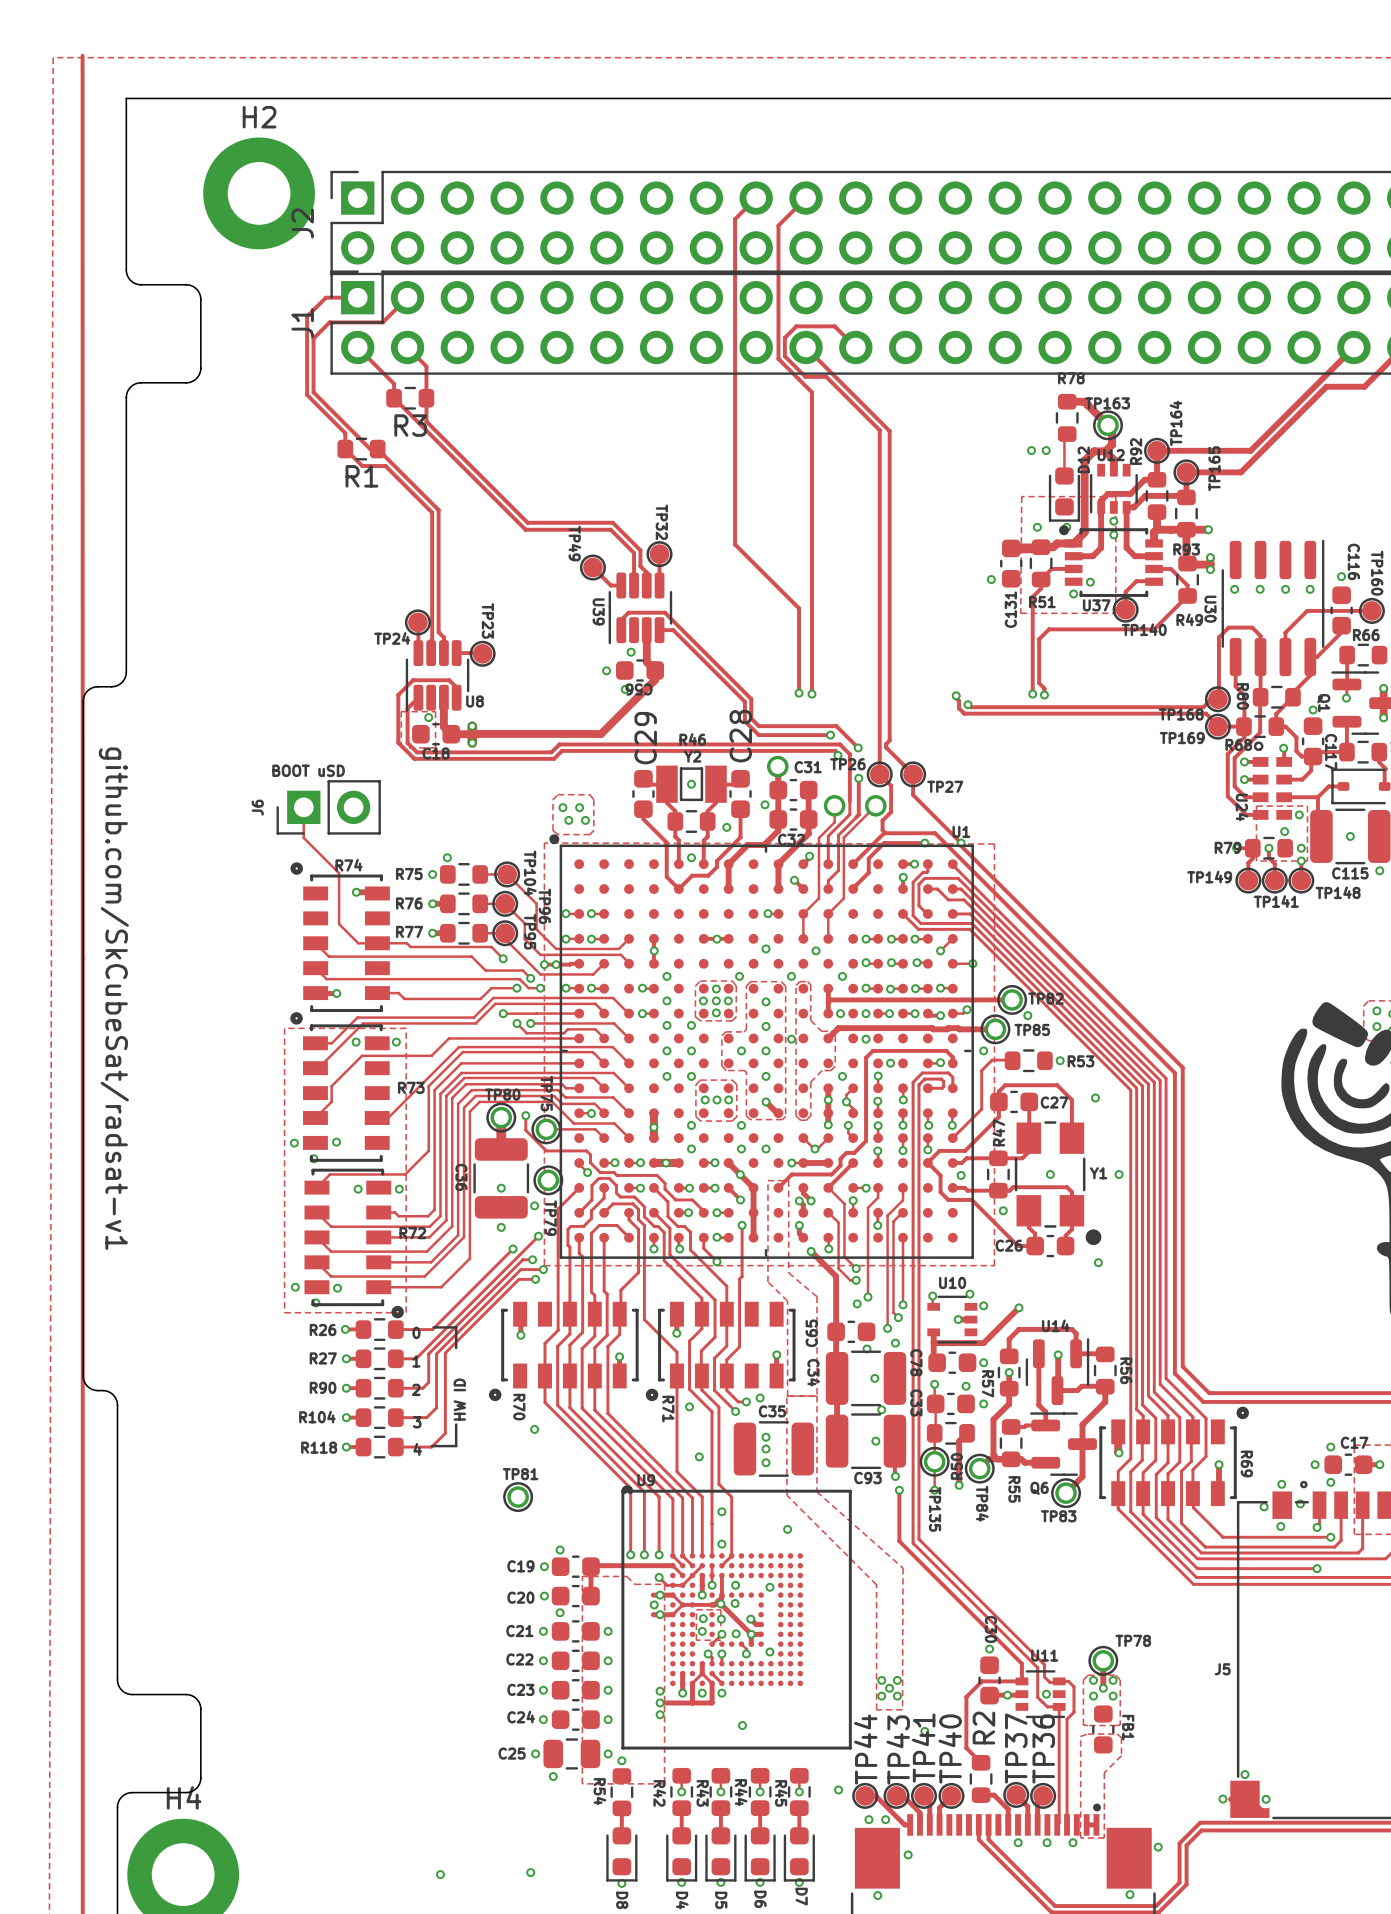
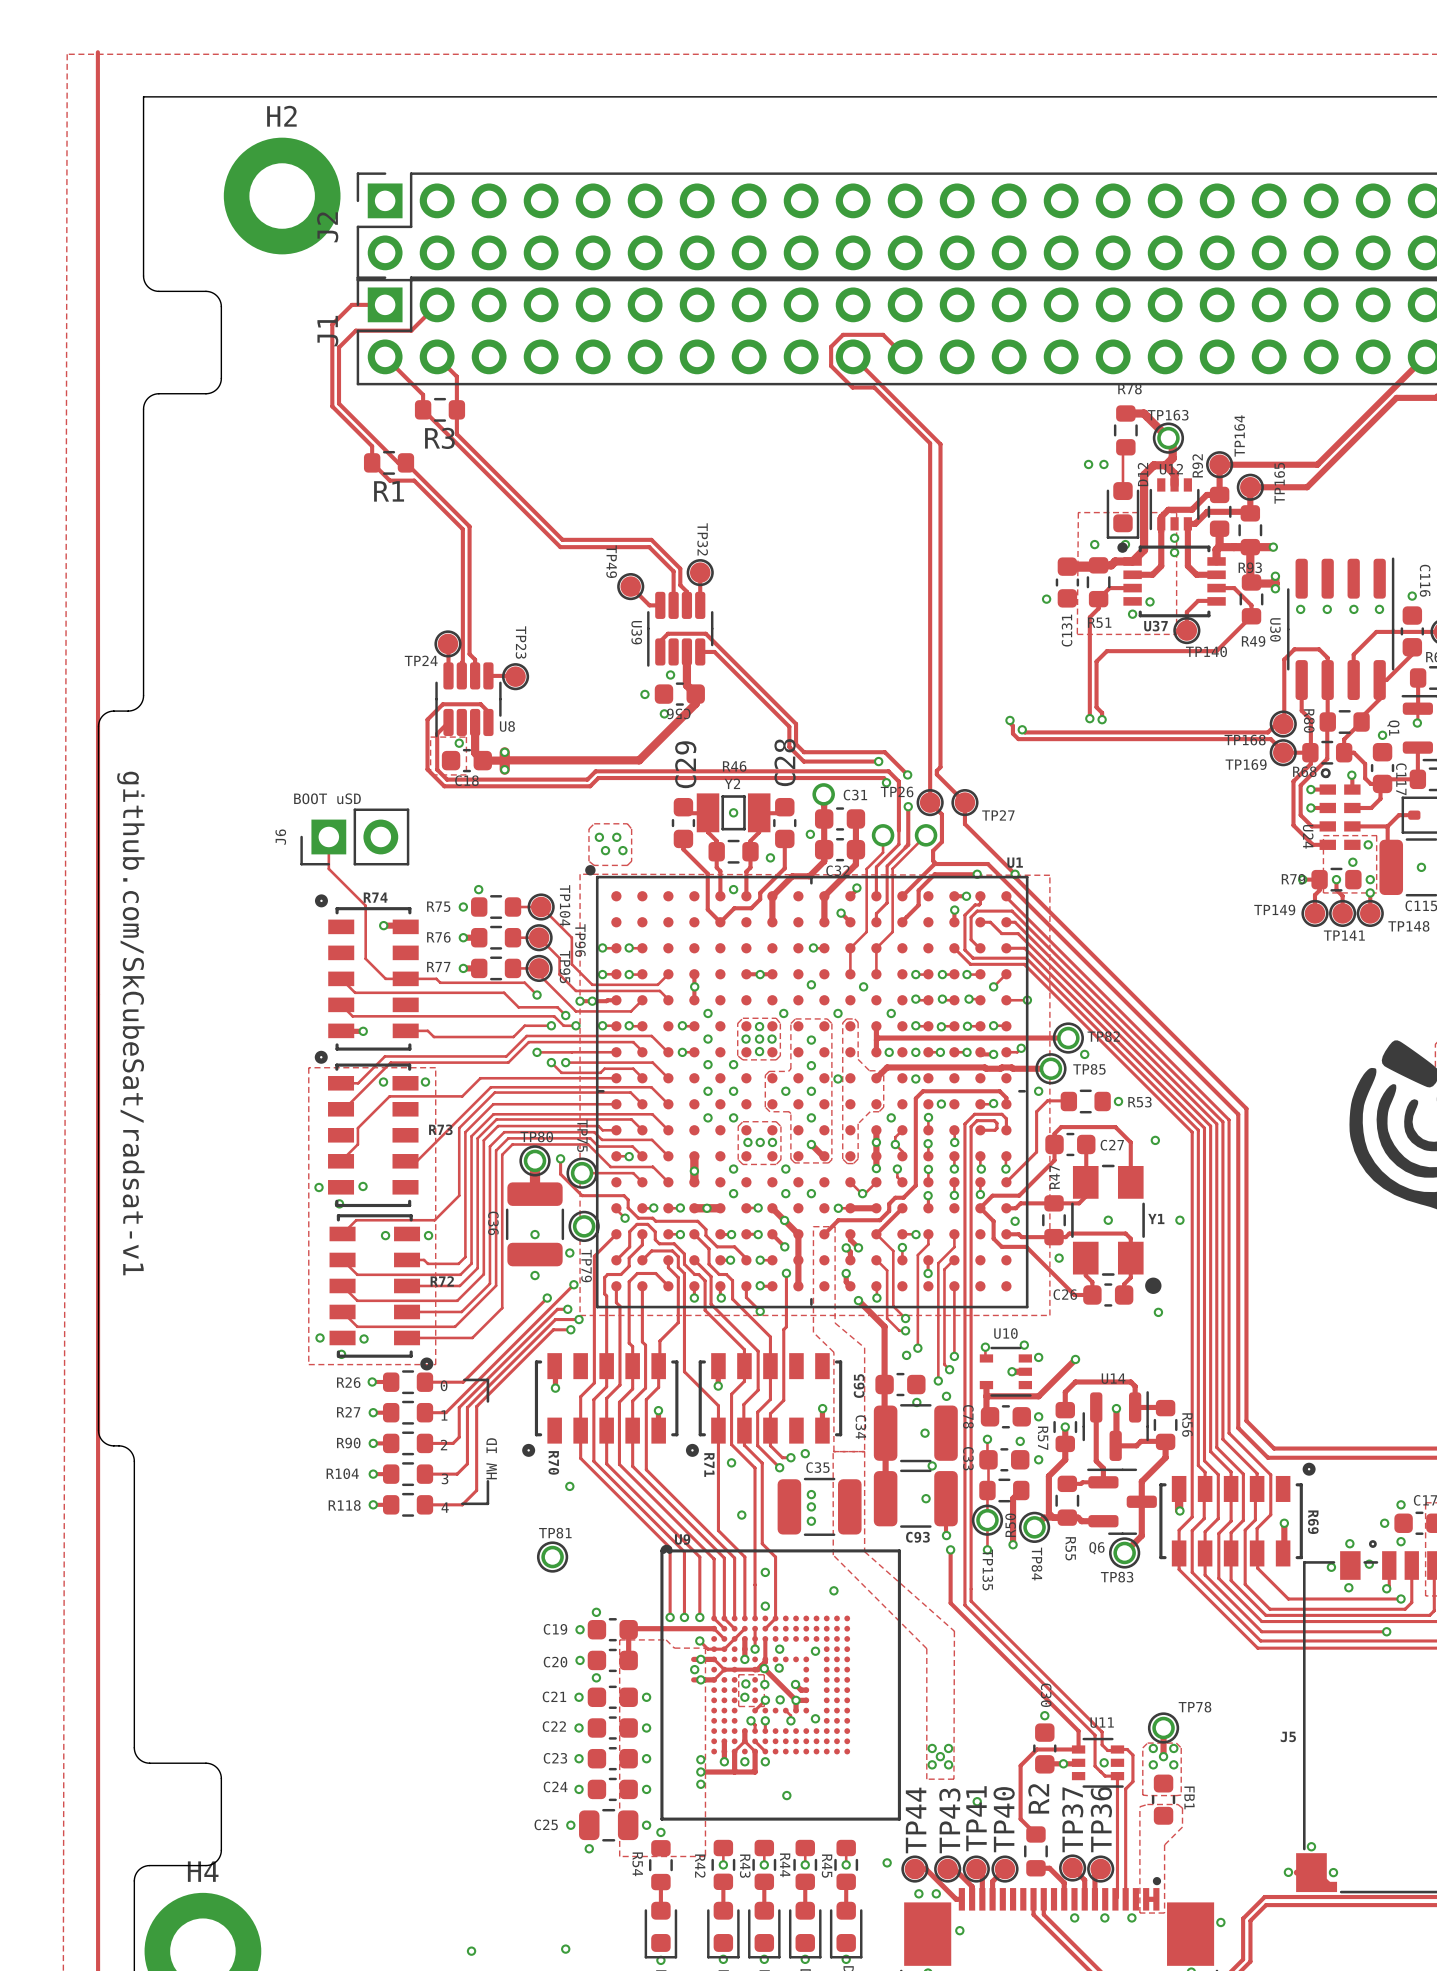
track: (756, 198) (735, 219) (735, 544) (799, 608) (799, 693) -> none
track: (806, 198) (778, 225) (778, 358) (811, 392) (811, 694) -> none
via: (799, 693) -> none
via: (811, 694) -> none

